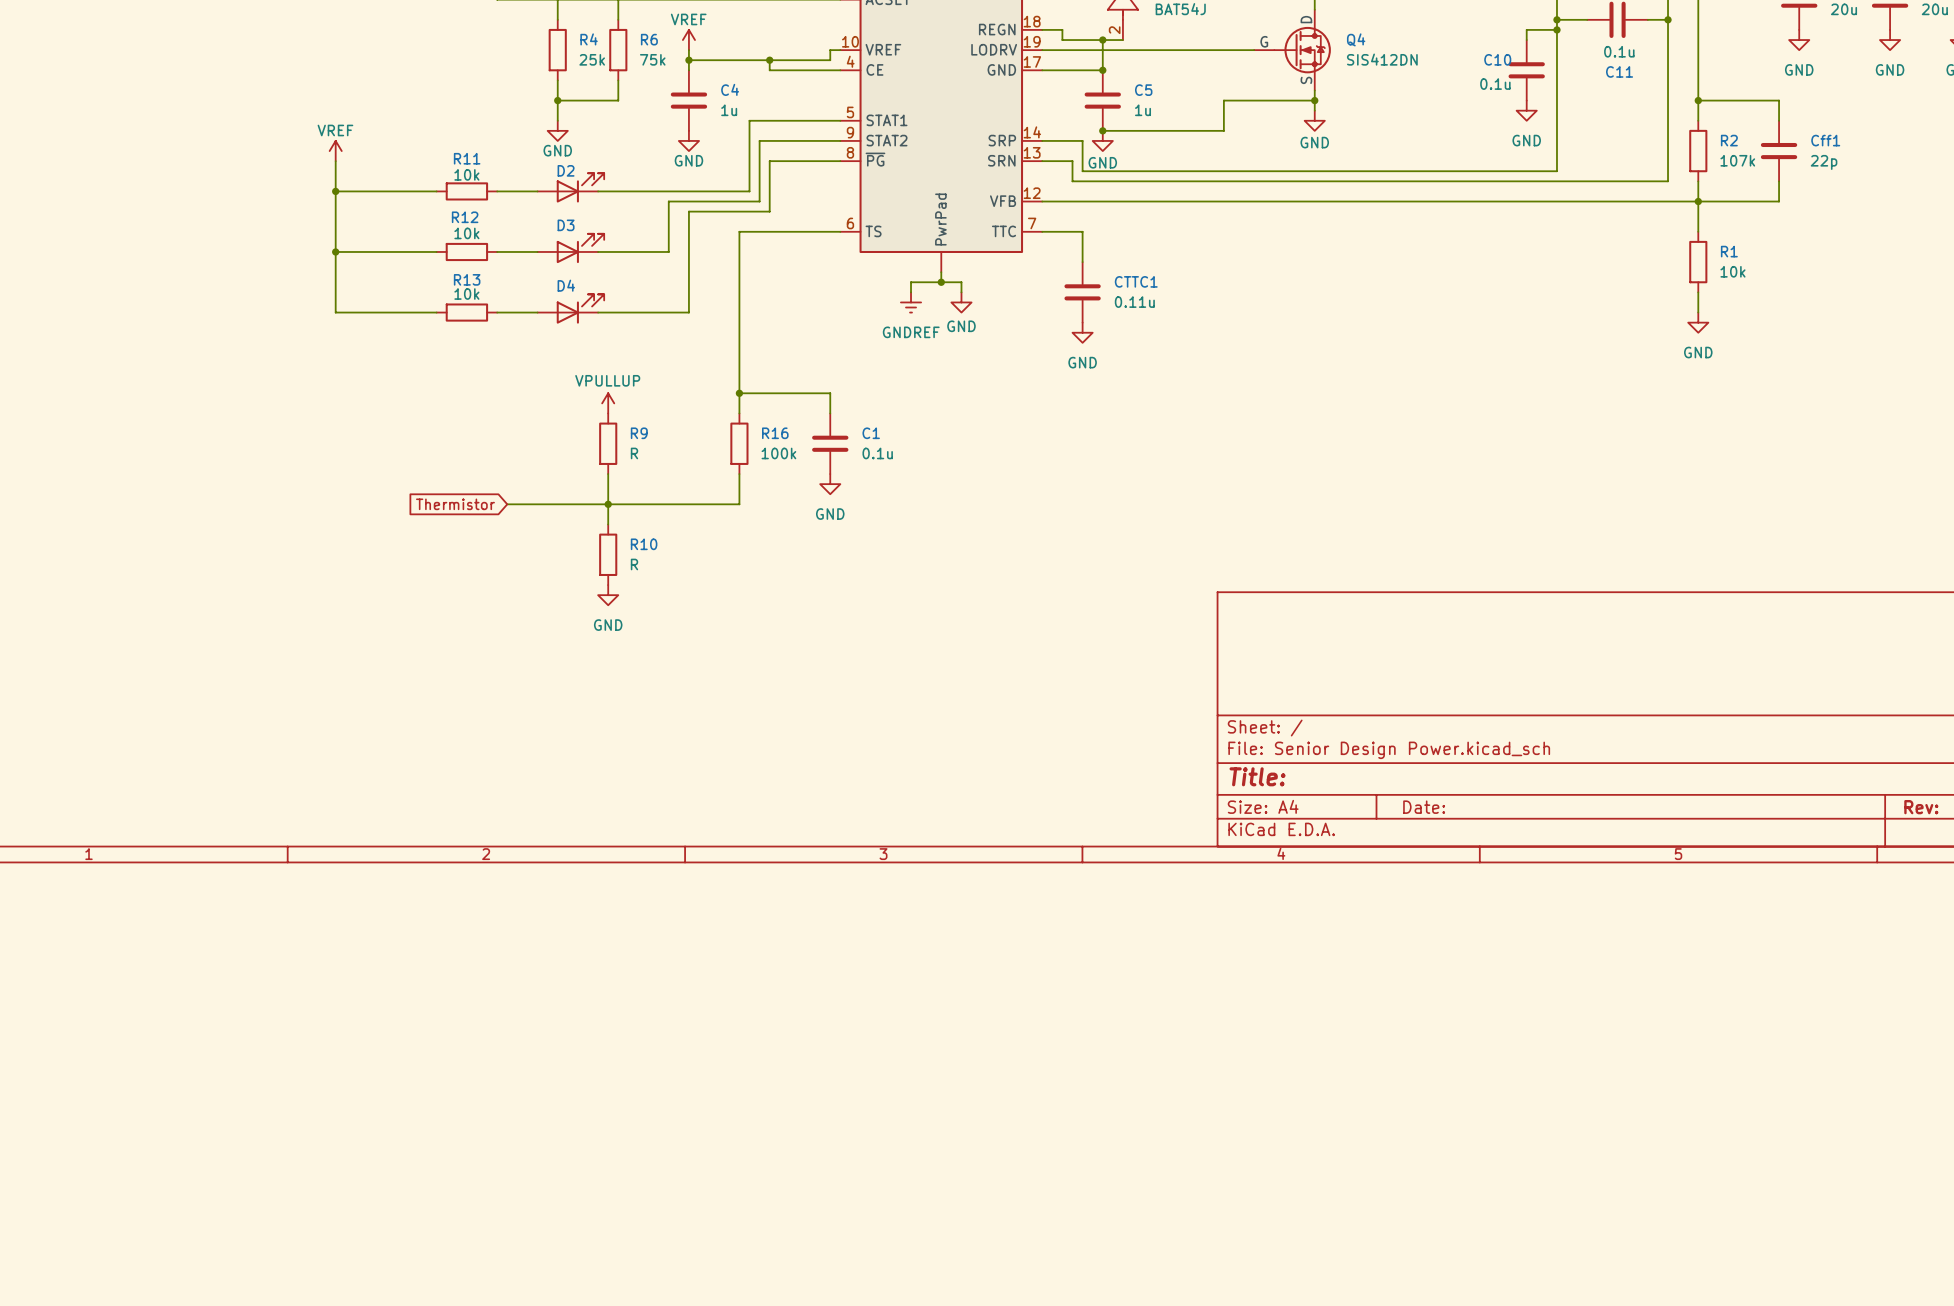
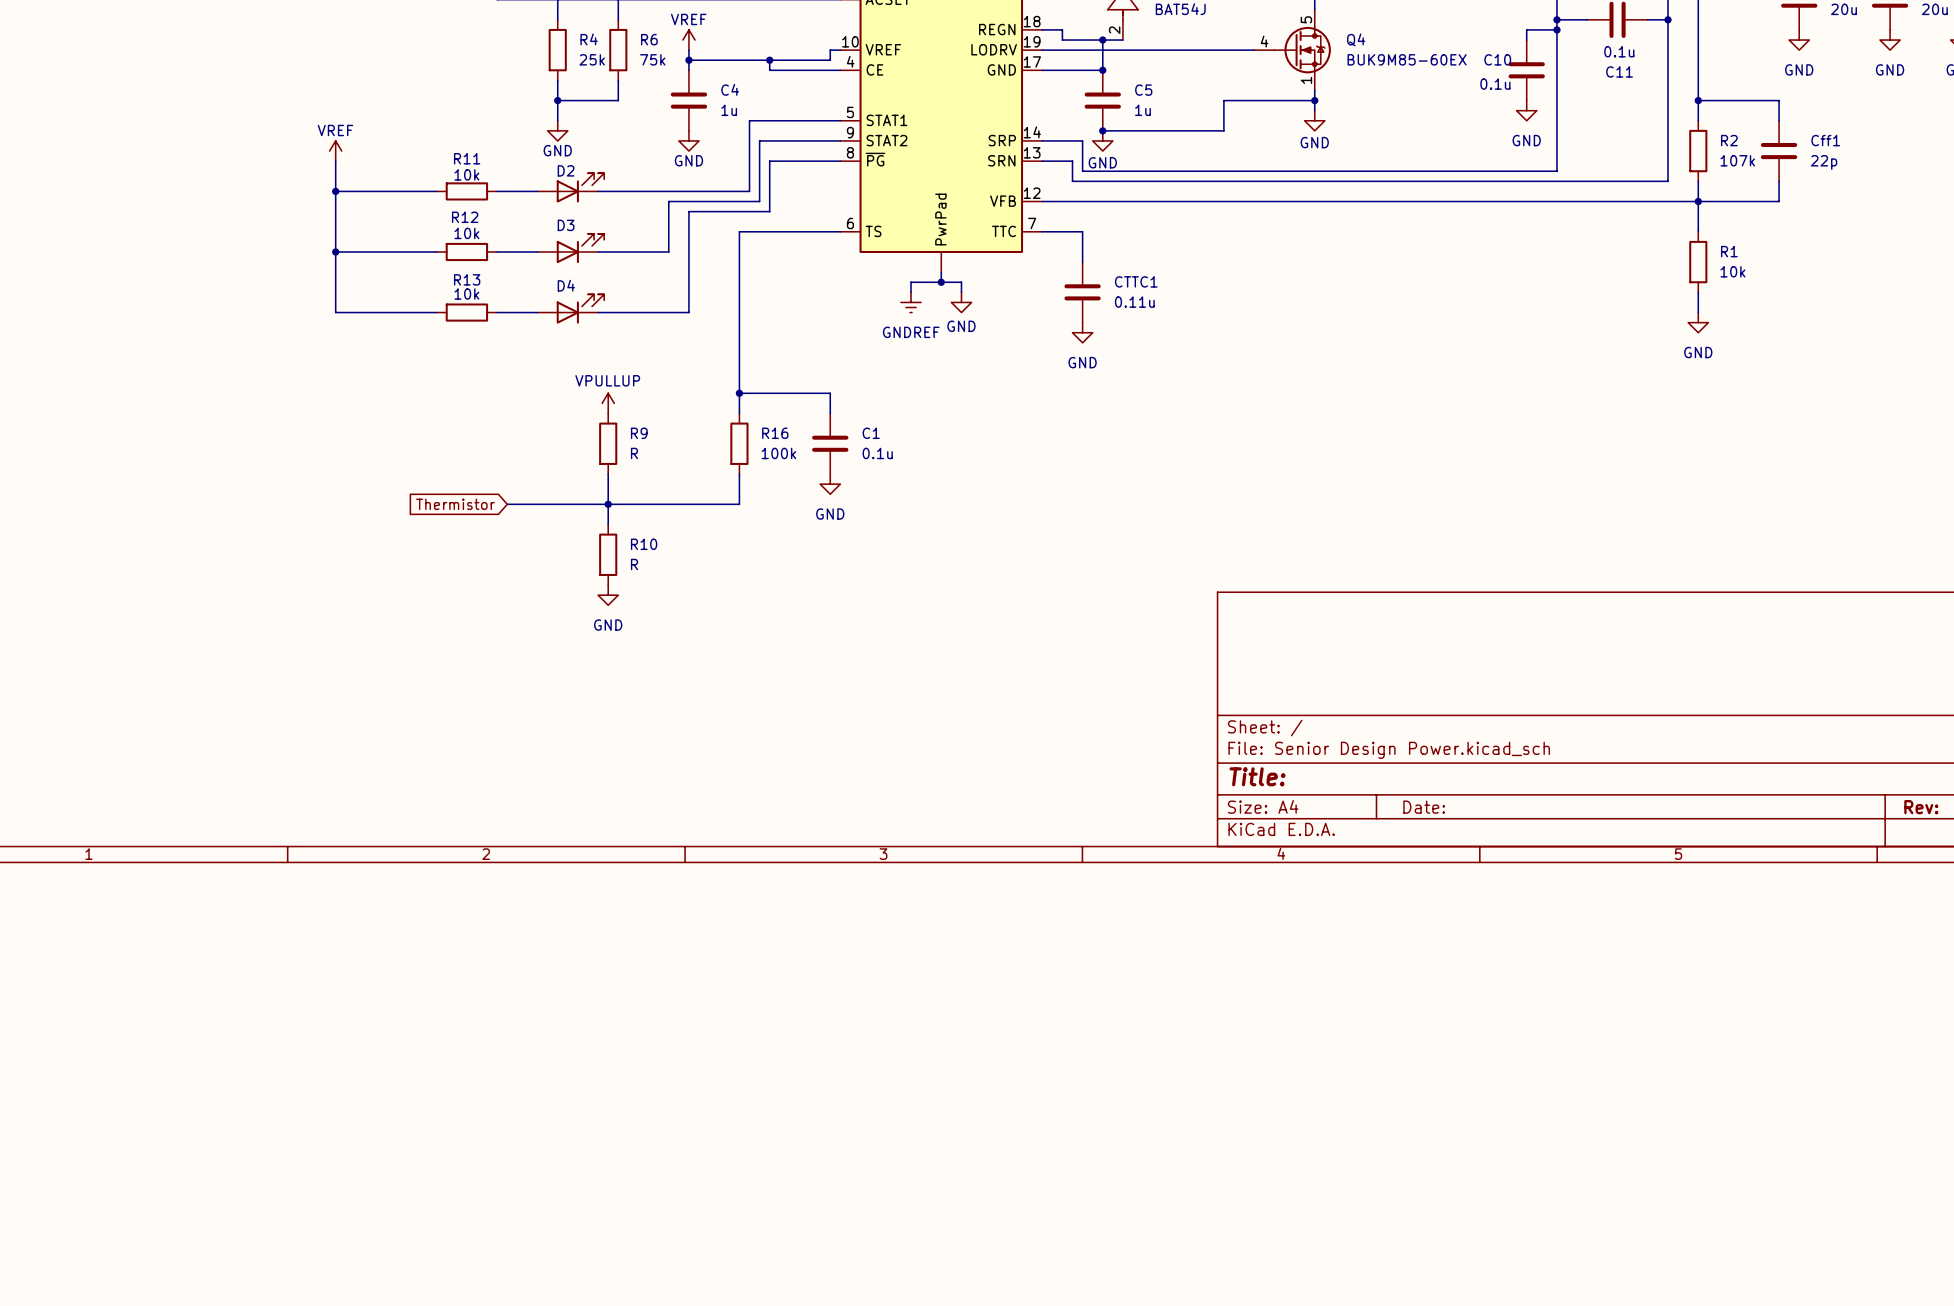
Q4 pin name: D (1306, 19) -> none
Q4 pin number: none -> 5 (1306, 19)
Q4 pin name: G (1264, 41) -> none
Q4 pin number: none -> 4 (1264, 41)
Q4 value: SIS412DN (1382, 59) -> BUK9M85-60EX (1407, 59)
Q4 pin name: S (1306, 80) -> none
Q4 pin number: none -> 1 (1306, 80)

